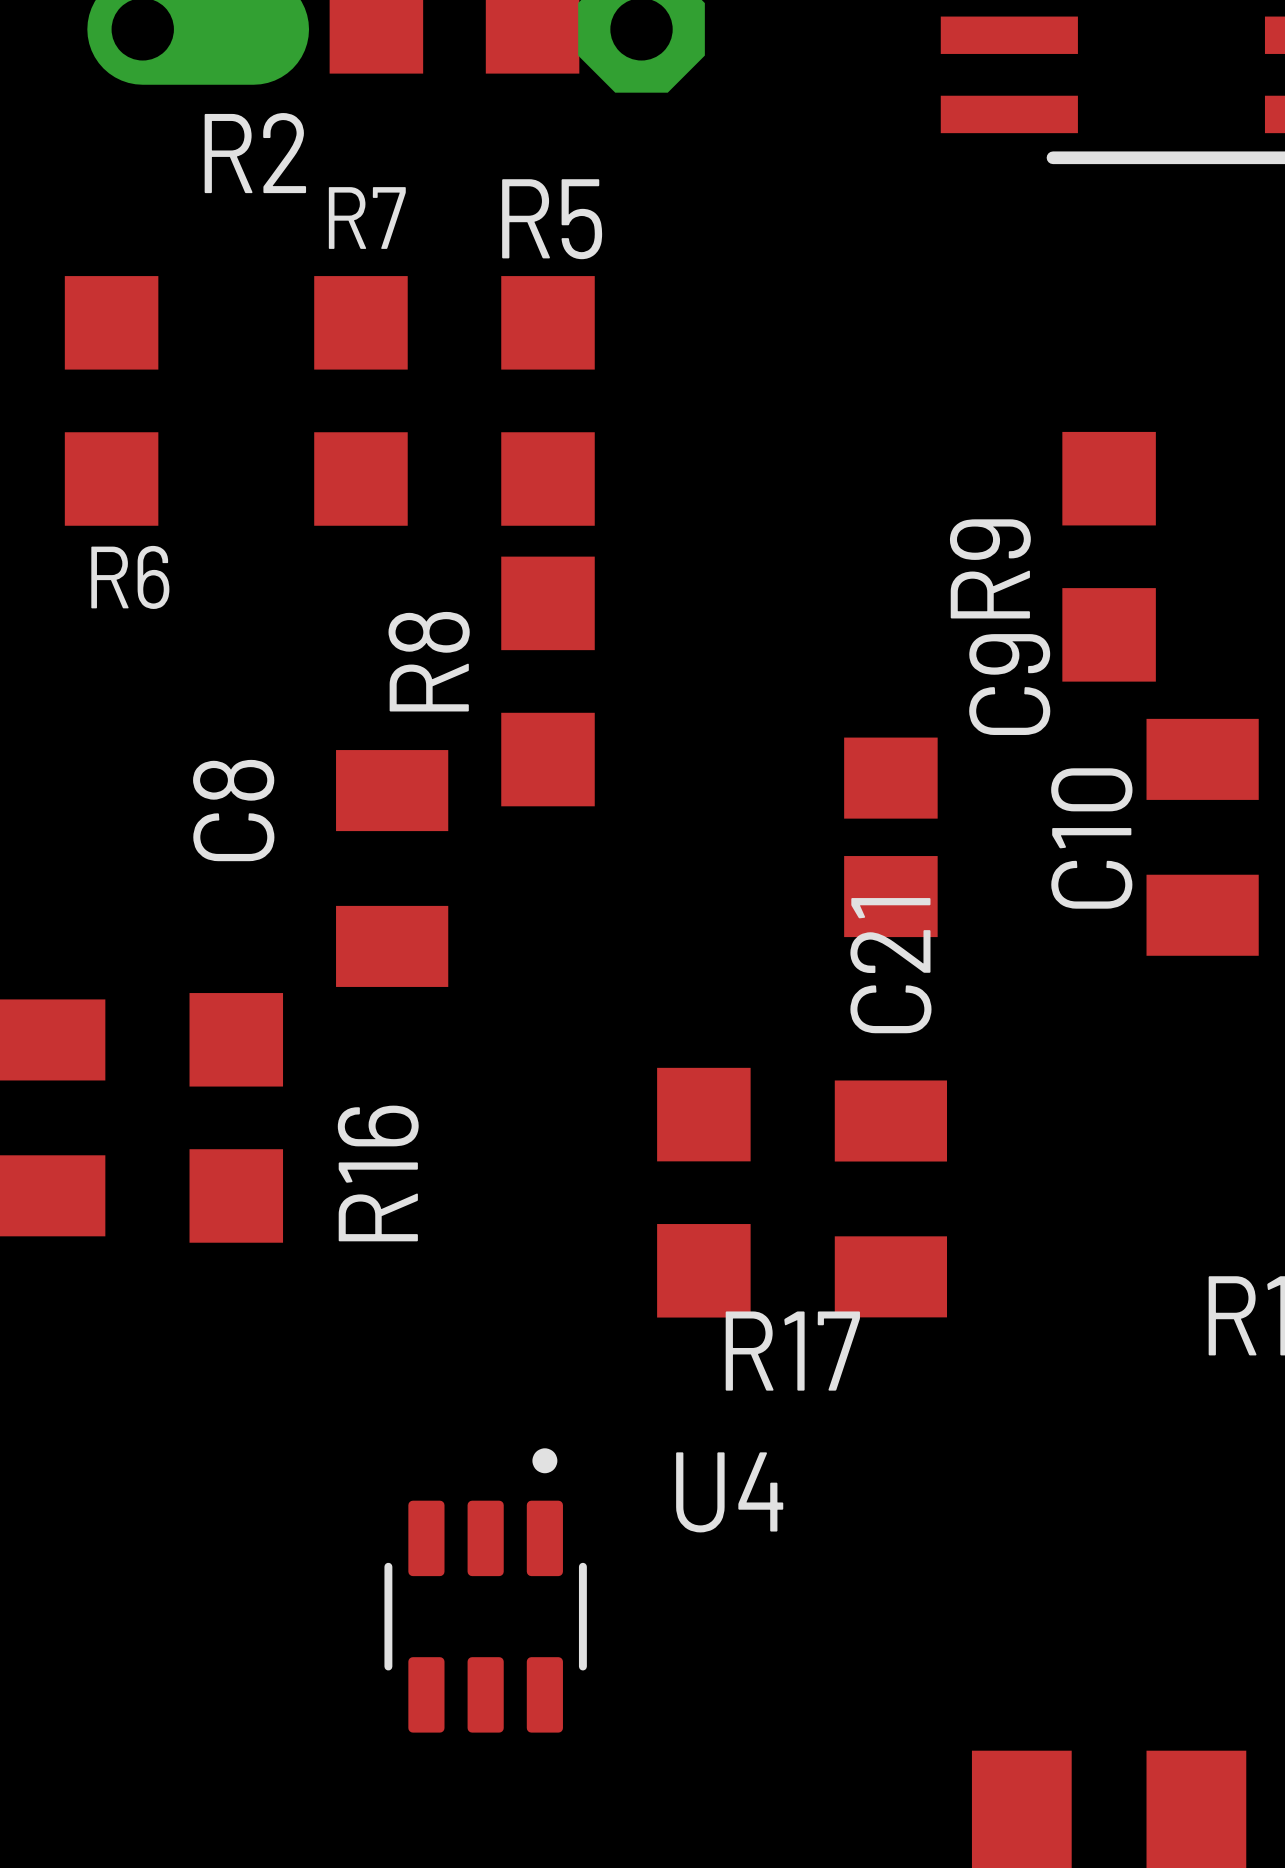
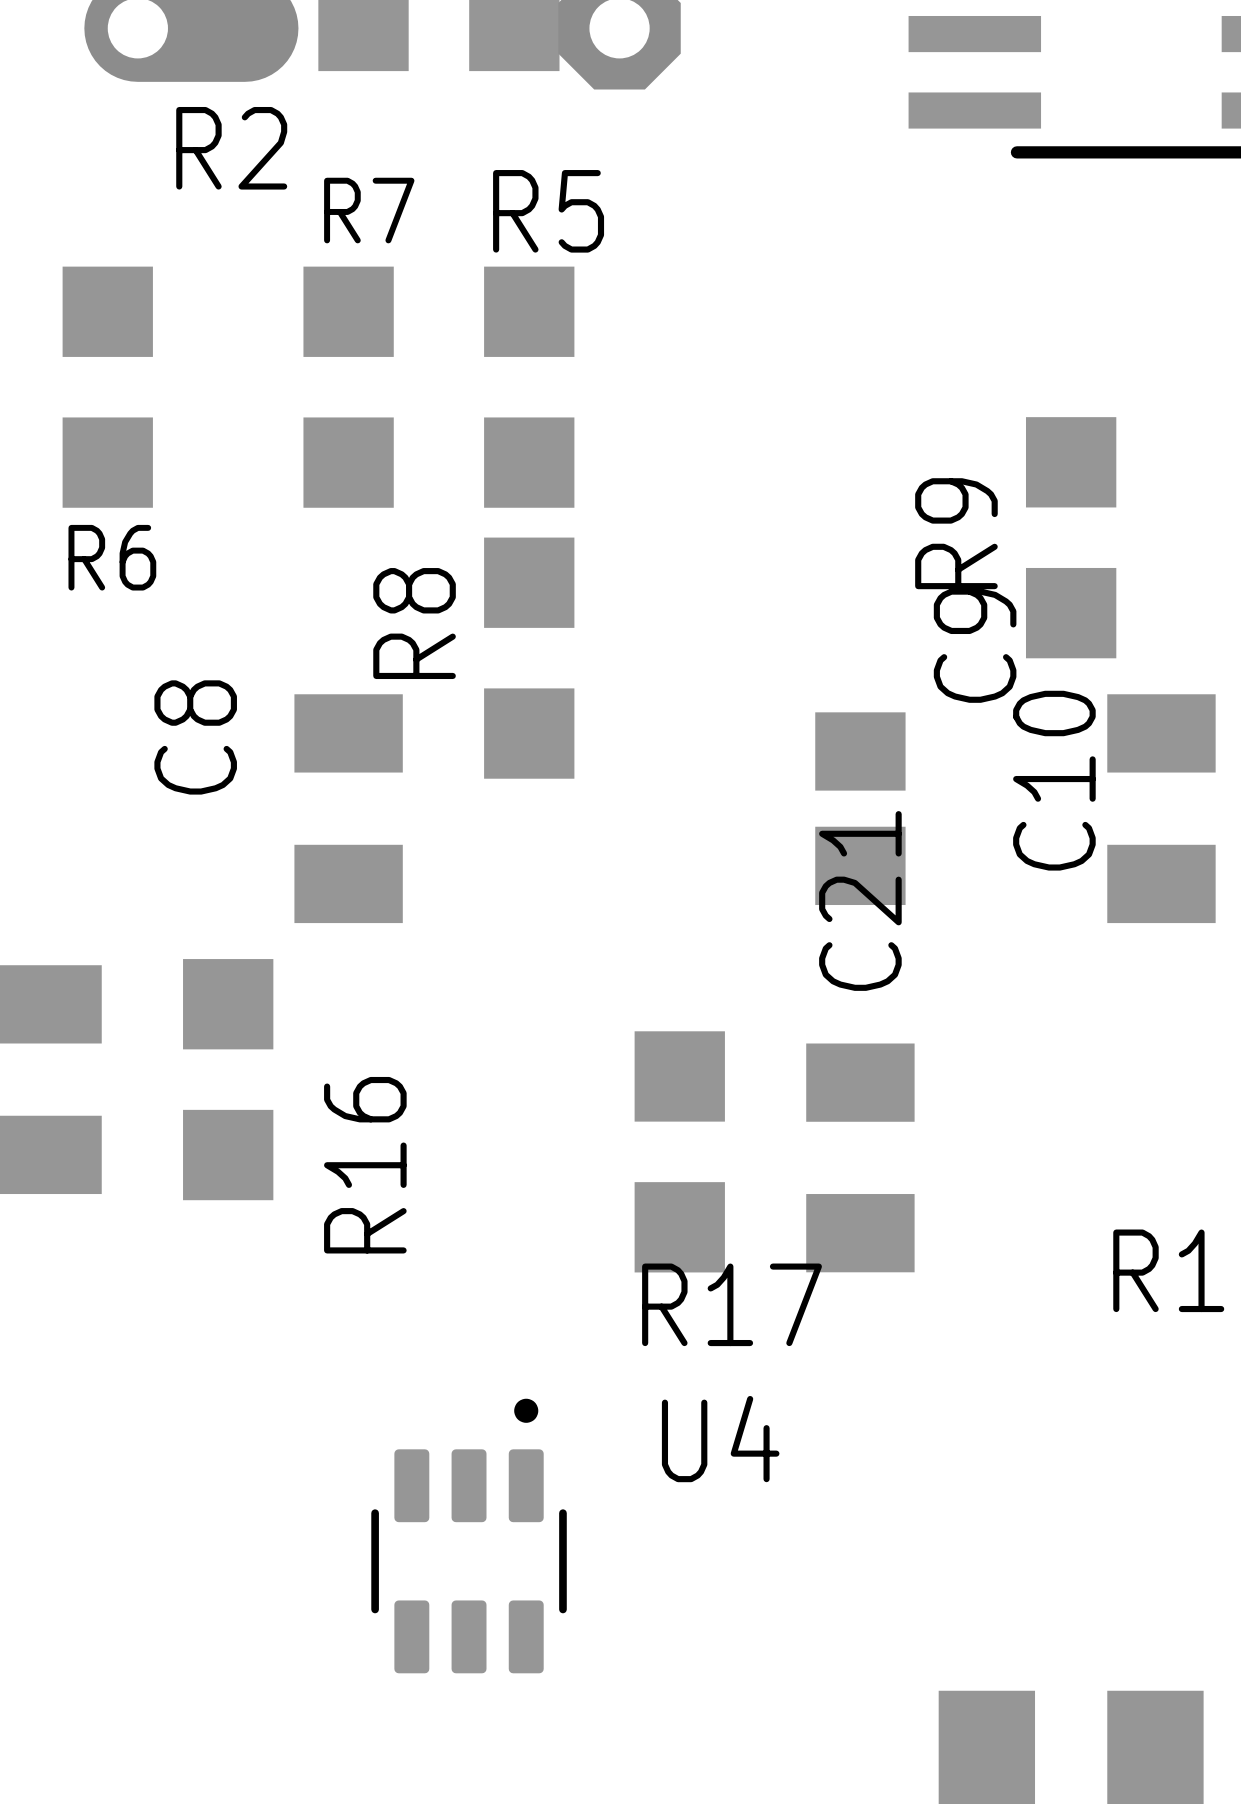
C8 position: (392, 868) -> (348, 808)

